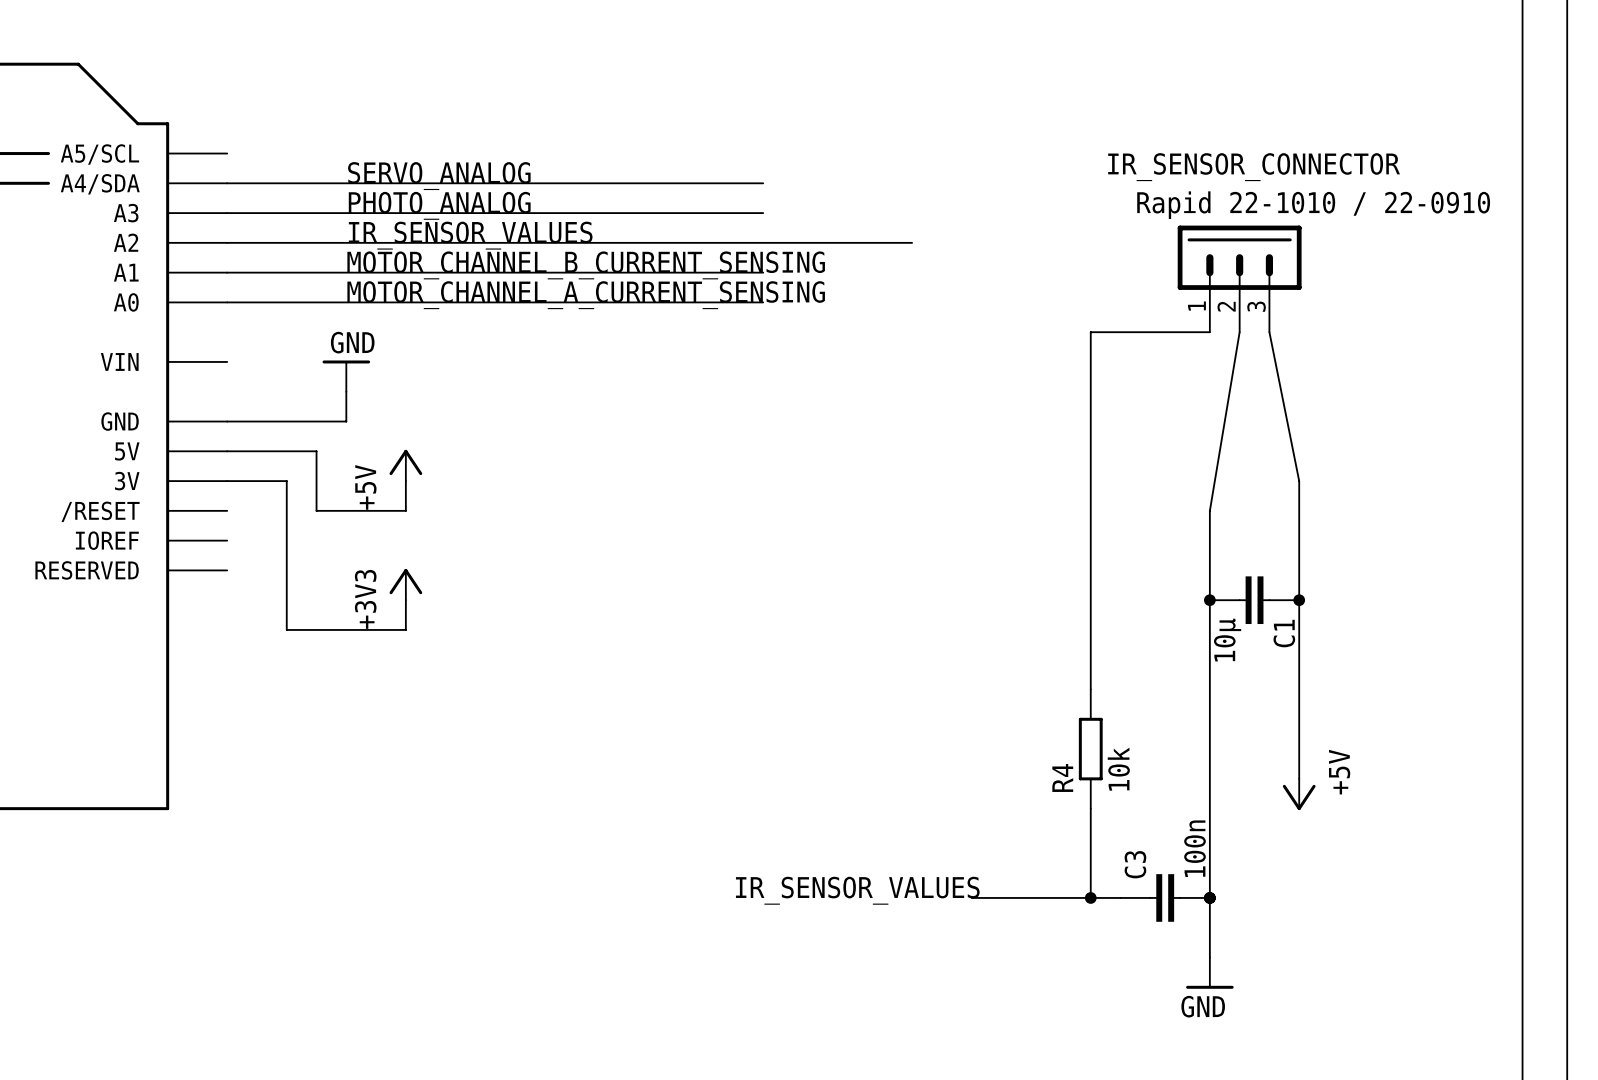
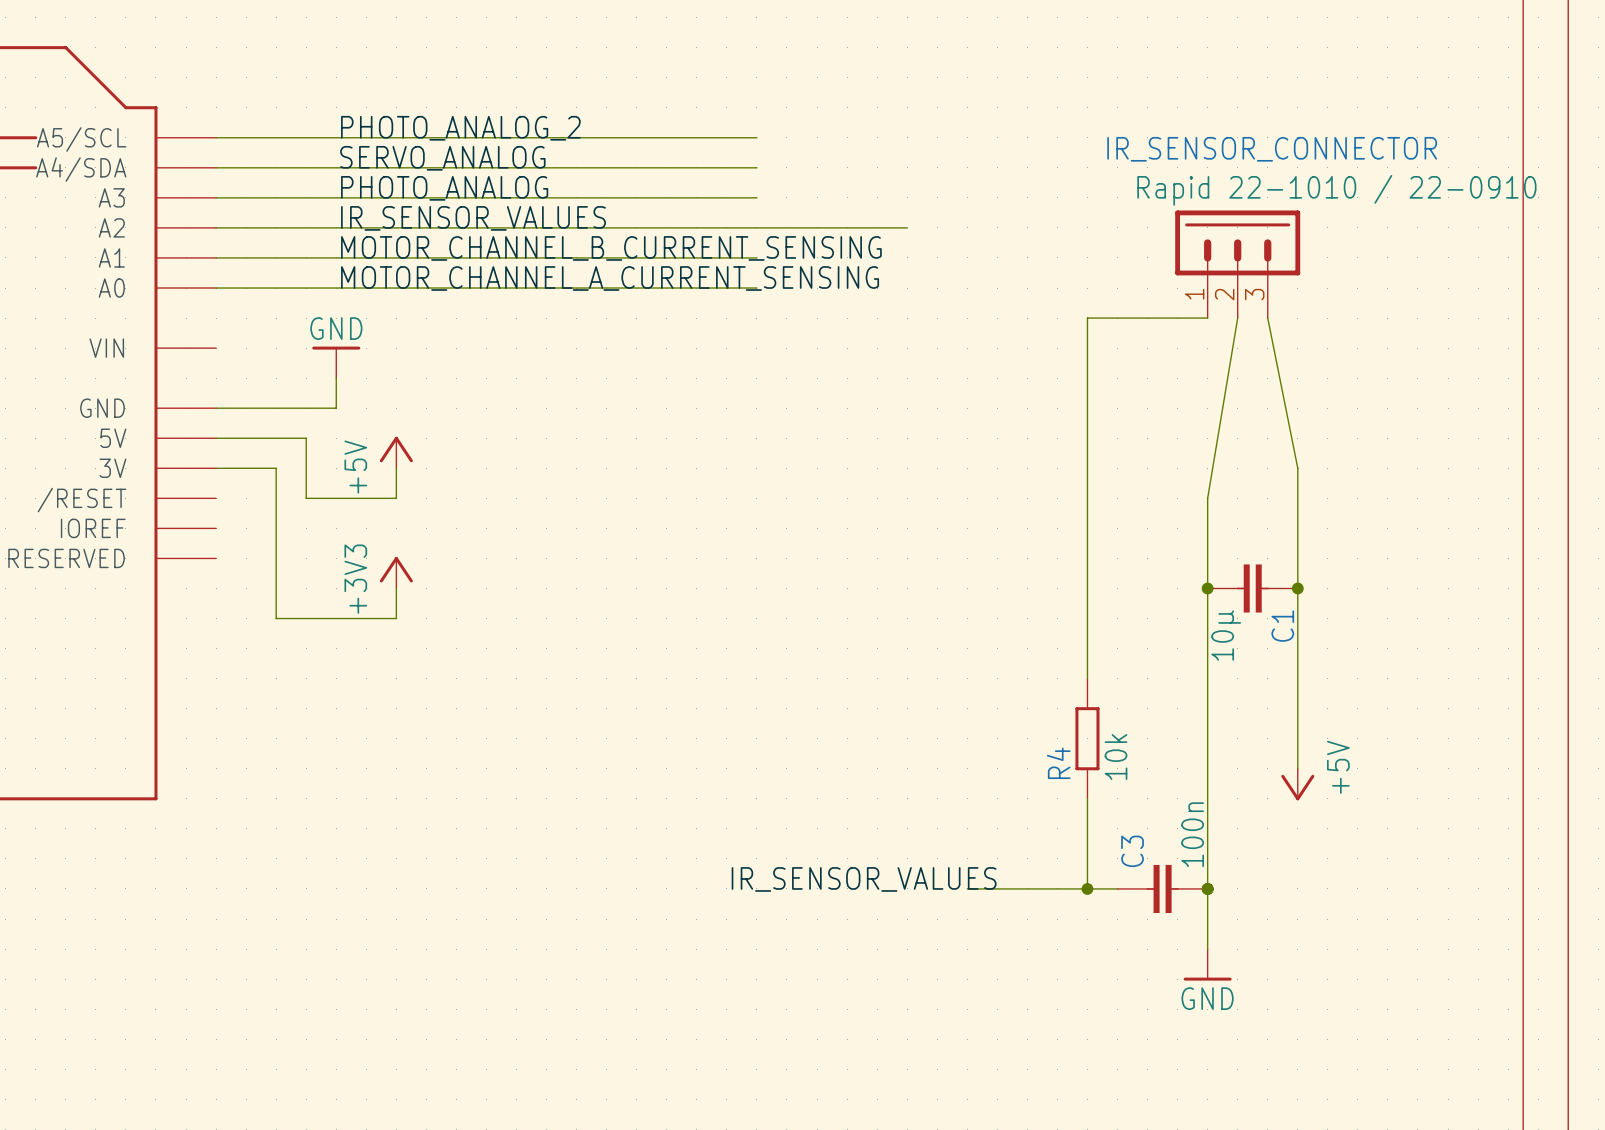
label: none -> PHOTO_ANALOG_2 (460, 128)
wire: none -> (216, 137) (756, 137)

